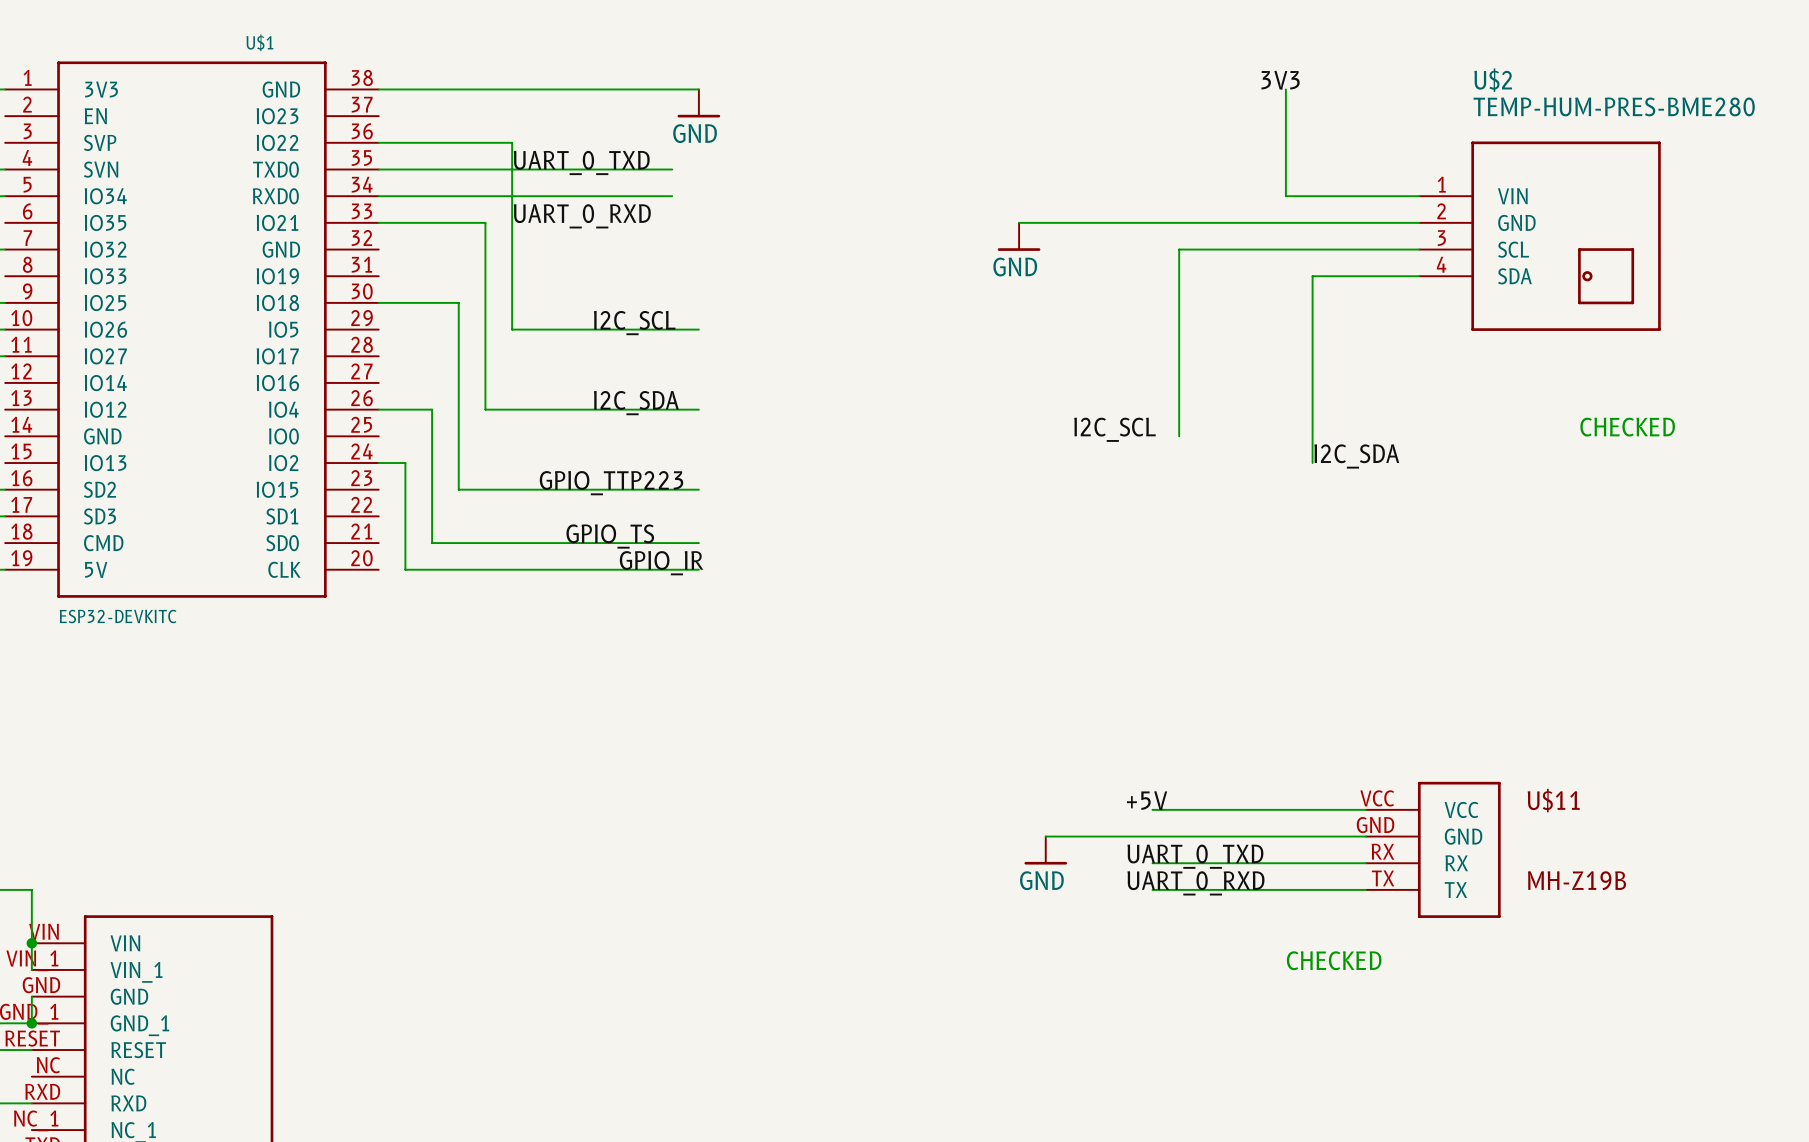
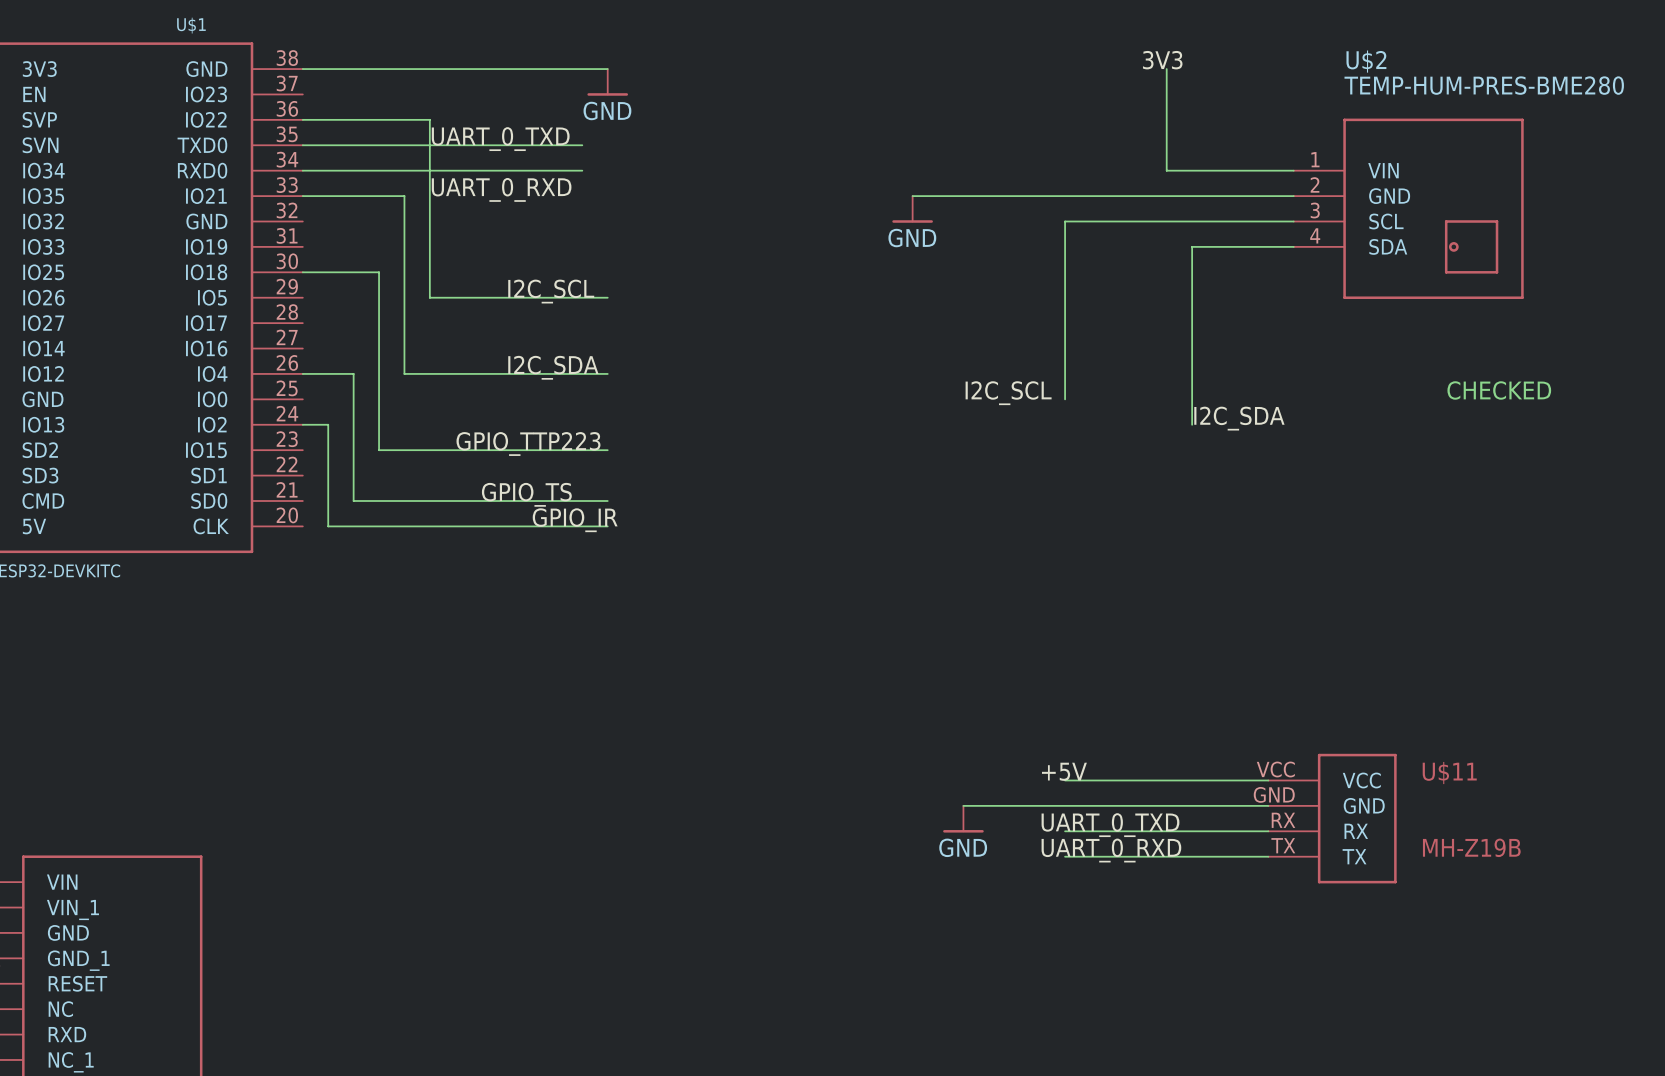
label position: +5V (1147, 800) -> +5V (1064, 771)
wire: (1152, 809) (1365, 809) -> (1065, 856) (1268, 856)
wire: (1045, 836) (1179, 836) -> none
U$11 position: (1433, 849) -> (1332, 818)
power symbol position: GND (1045, 850) -> GND (963, 819)
label position: UART_0_TXD (1195, 856) -> UART_0_TXD (1110, 825)
wire: none -> (963, 805) (1039, 805)
label position: UART_0_RXD (1195, 883) -> UART_0_RXD (1111, 850)
text: CHECKED (1334, 960) -> none

